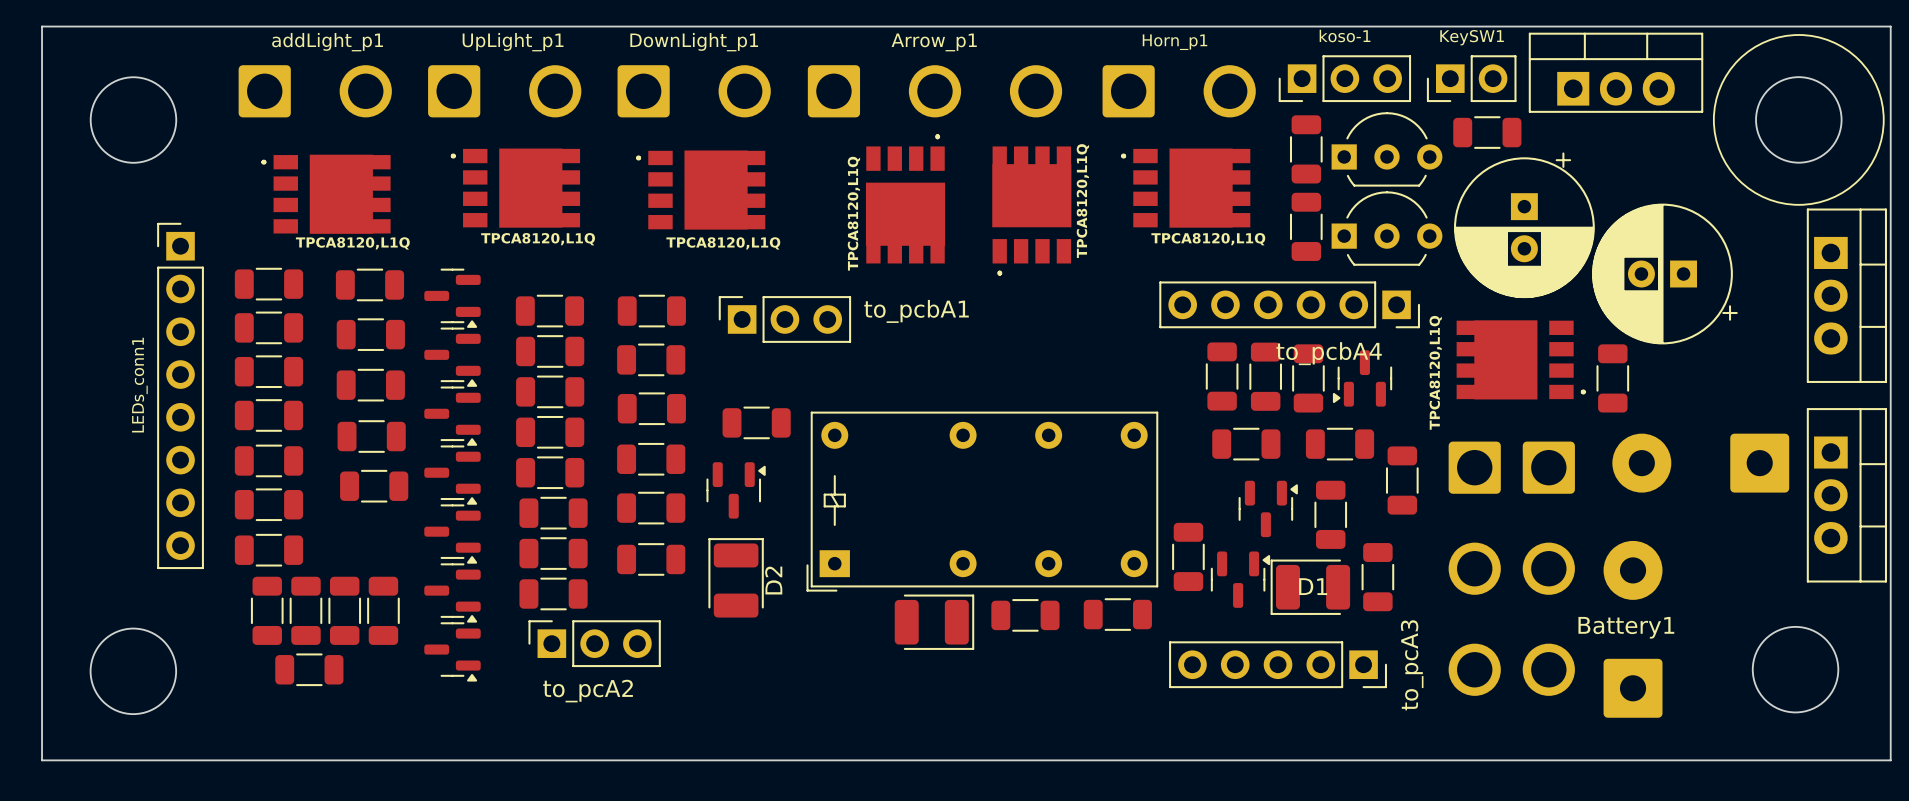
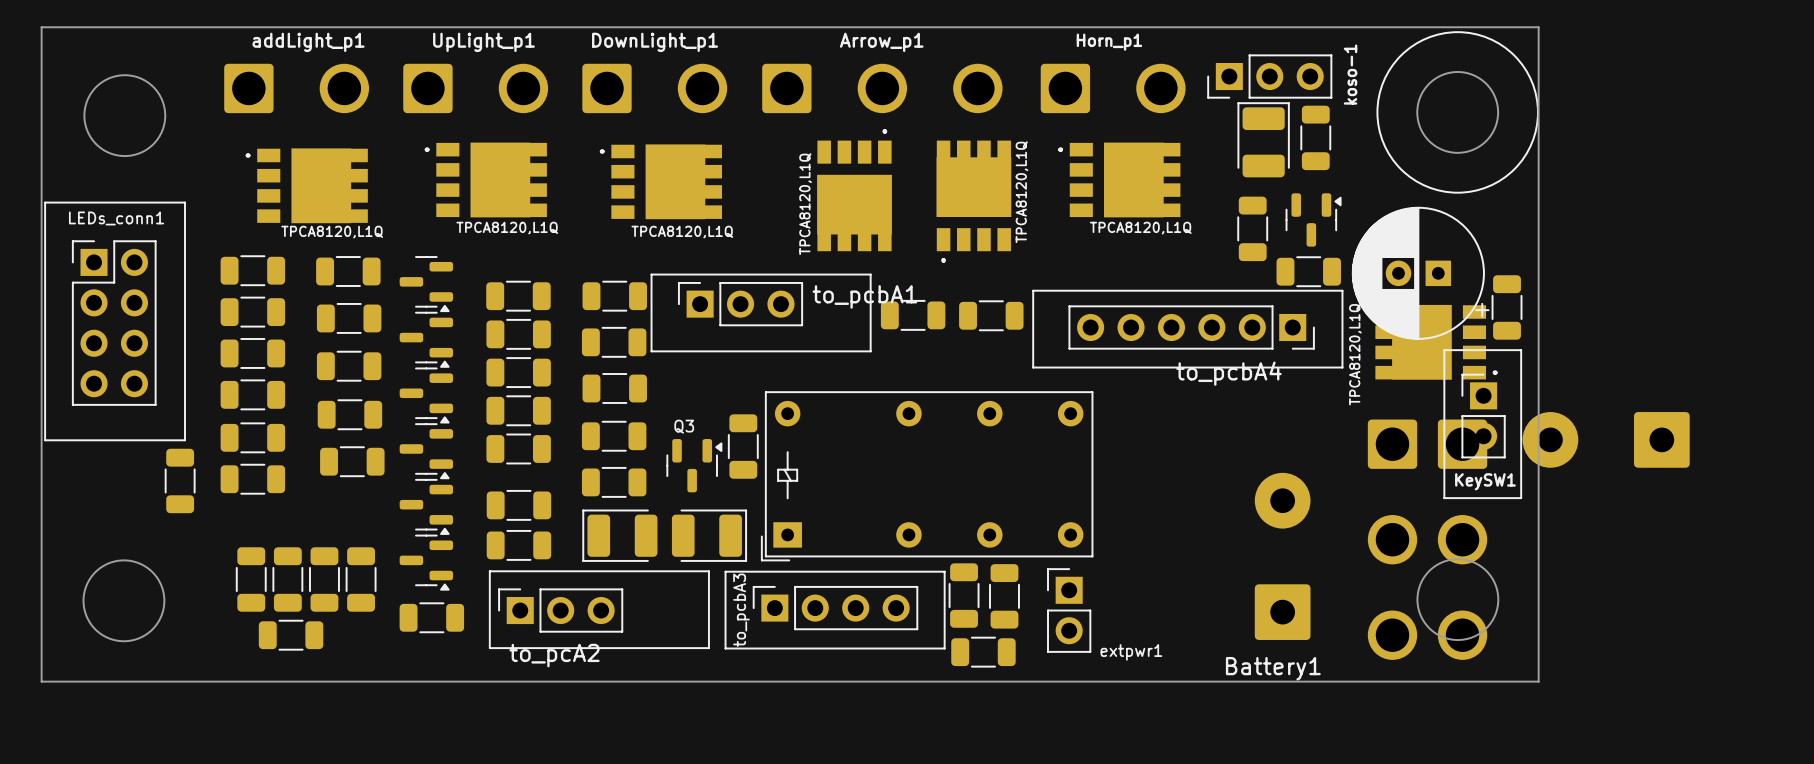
board edge: (45, 26) (42, 26) (42, 760) (1890, 760) (1890, 26) (1629, 26) -> (41, 27) (41, 681) (1538, 681) (1538, 27)
koso-1 name rotation: 0° (1345, 35) -> 90° counterclockwise (1350, 74)
koso-1 name position: koso-1 (1345, 35) -> koso-1 (1350, 74)
KeySW1 name position: KeySW1 (1472, 37) -> KeySW1 (1485, 481)
part: (1616, 72) -> none
KeySW1 rotation: 0° (1471, 78) -> 90° clockwise (1483, 416)
KeySW1 position: (1471, 78) -> (1483, 416)
part footprint: [1331, 112, 1443, 187] -> [1300, 105, 1332, 171]
drawing position: (1798, 119) -> (1457, 112)
round board edge position: (1798, 119) -> (1457, 112)
part: (1487, 132) -> none
part: none -> (1263, 139)
part: (1306, 149) -> none
part footprint: [1331, 191, 1443, 266] -> [1285, 193, 1342, 247]
line: none -> (45, 202) (184, 202) (184, 440) (45, 440) (45, 202)
LEDs_conn1 footprint: [157, 222, 204, 570] -> [71, 240, 157, 406]
part rotation: 0° (1524, 225) -> 90° clockwise (1420, 273)
part position: (1306, 226) -> (1252, 228)
part: (1664, 274) -> none
part: none -> (1308, 271)
line: none -> (651, 274) (870, 274) (870, 351) (651, 351) (651, 274)
part: (1846, 295) -> none
to_pcbA4 position: (1289, 304) -> (1191, 327)
line: none -> (1033, 290) (1342, 290) (1342, 367) (1033, 367) (1033, 290)
part: none -> (913, 315)
part: none -> (991, 315)
line: none -> (1444, 350) (1521, 350) (1521, 498) (1444, 498) (1444, 350)
part: (1222, 376) -> none
part: (1265, 376) -> none
part: (1308, 378) -> none
part: (1362, 378) -> none
part position: (1612, 378) -> (1507, 307)
LEDs_conn1 name position: LEDs_conn1 (139, 385) -> LEDs_conn1 (116, 218)
part rotation: 0° (756, 422) -> 90° clockwise (743, 446)
part position: (756, 422) -> (743, 446)
part: (1246, 444) -> none
part: (1340, 444) -> none
Q3 name: none -> Q3 (684, 426)
part: (1402, 480) -> none
part: (1846, 495) -> none
part: (1268, 508) -> none
part: (553, 513) -> none
part: (1330, 514) -> none
part: none -> (518, 505)
part footprint: [617, 543, 686, 576] -> [582, 509, 658, 562]
part rotation: 0° (268, 550) -> 90° clockwise (180, 480)
part position: (268, 550) -> (180, 480)
part: (553, 553) -> none
part: (1188, 556) -> none
part: none -> (518, 545)
D2: (736, 577) -> none
part: (1377, 577) -> none
part: (1240, 579) -> none
D1: (1310, 587) -> none
part: (553, 593) -> none
line: none -> (489, 571) (708, 571) (708, 648) (489, 648) (489, 571)
line: none -> (725, 571) (944, 571) (944, 648) (725, 648) (725, 571)
part: (1117, 614) -> none
part rotation: 0° (1025, 615) -> 90° clockwise (964, 595)
part footprint: [424, 622, 481, 682] -> [399, 602, 465, 634]
part position: (934, 622) -> (709, 535)
Battery1 name position: Battery1 (1626, 627) -> Battery1 (1273, 668)
part: none -> (1004, 596)
Battery1 position: (1633, 629) -> (1282, 556)
to_pcbA3: none -> (835, 608)
extpwr1: none -> (1069, 610)
to_pcA3: (1278, 664) -> none
round board edge position: (1795, 669) -> (1457, 599)
round board edge position: (133, 671) -> (123, 600)
part: none -> (983, 652)

